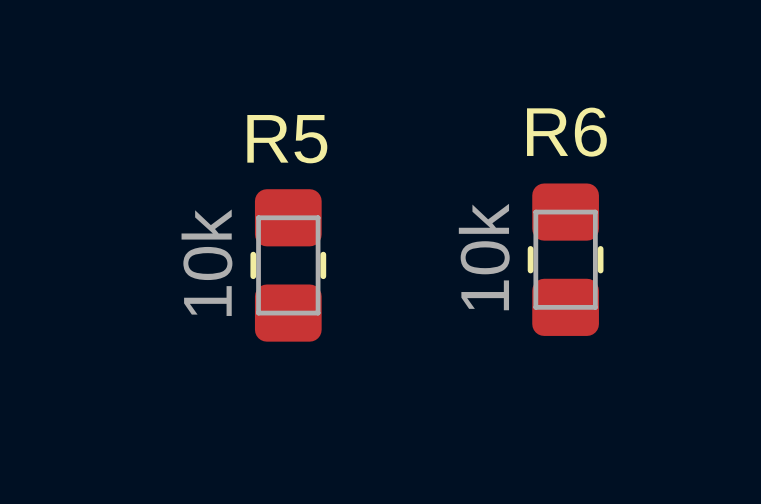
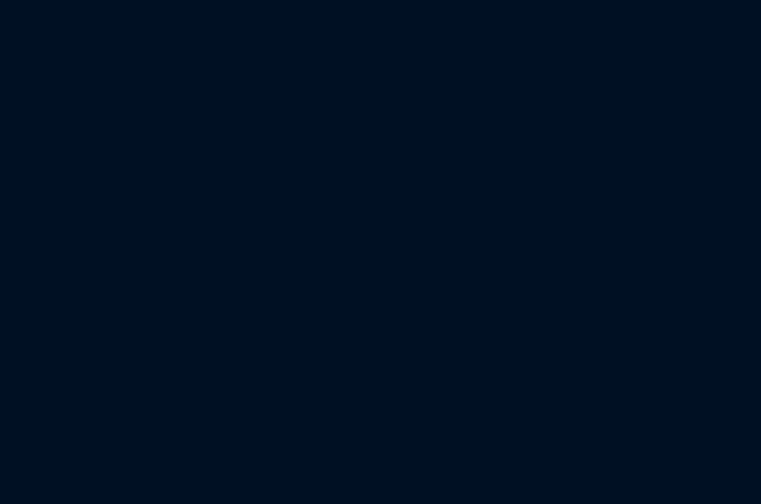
R6: 10k (565, 259) -> none
R5: 10k (288, 265) -> none

